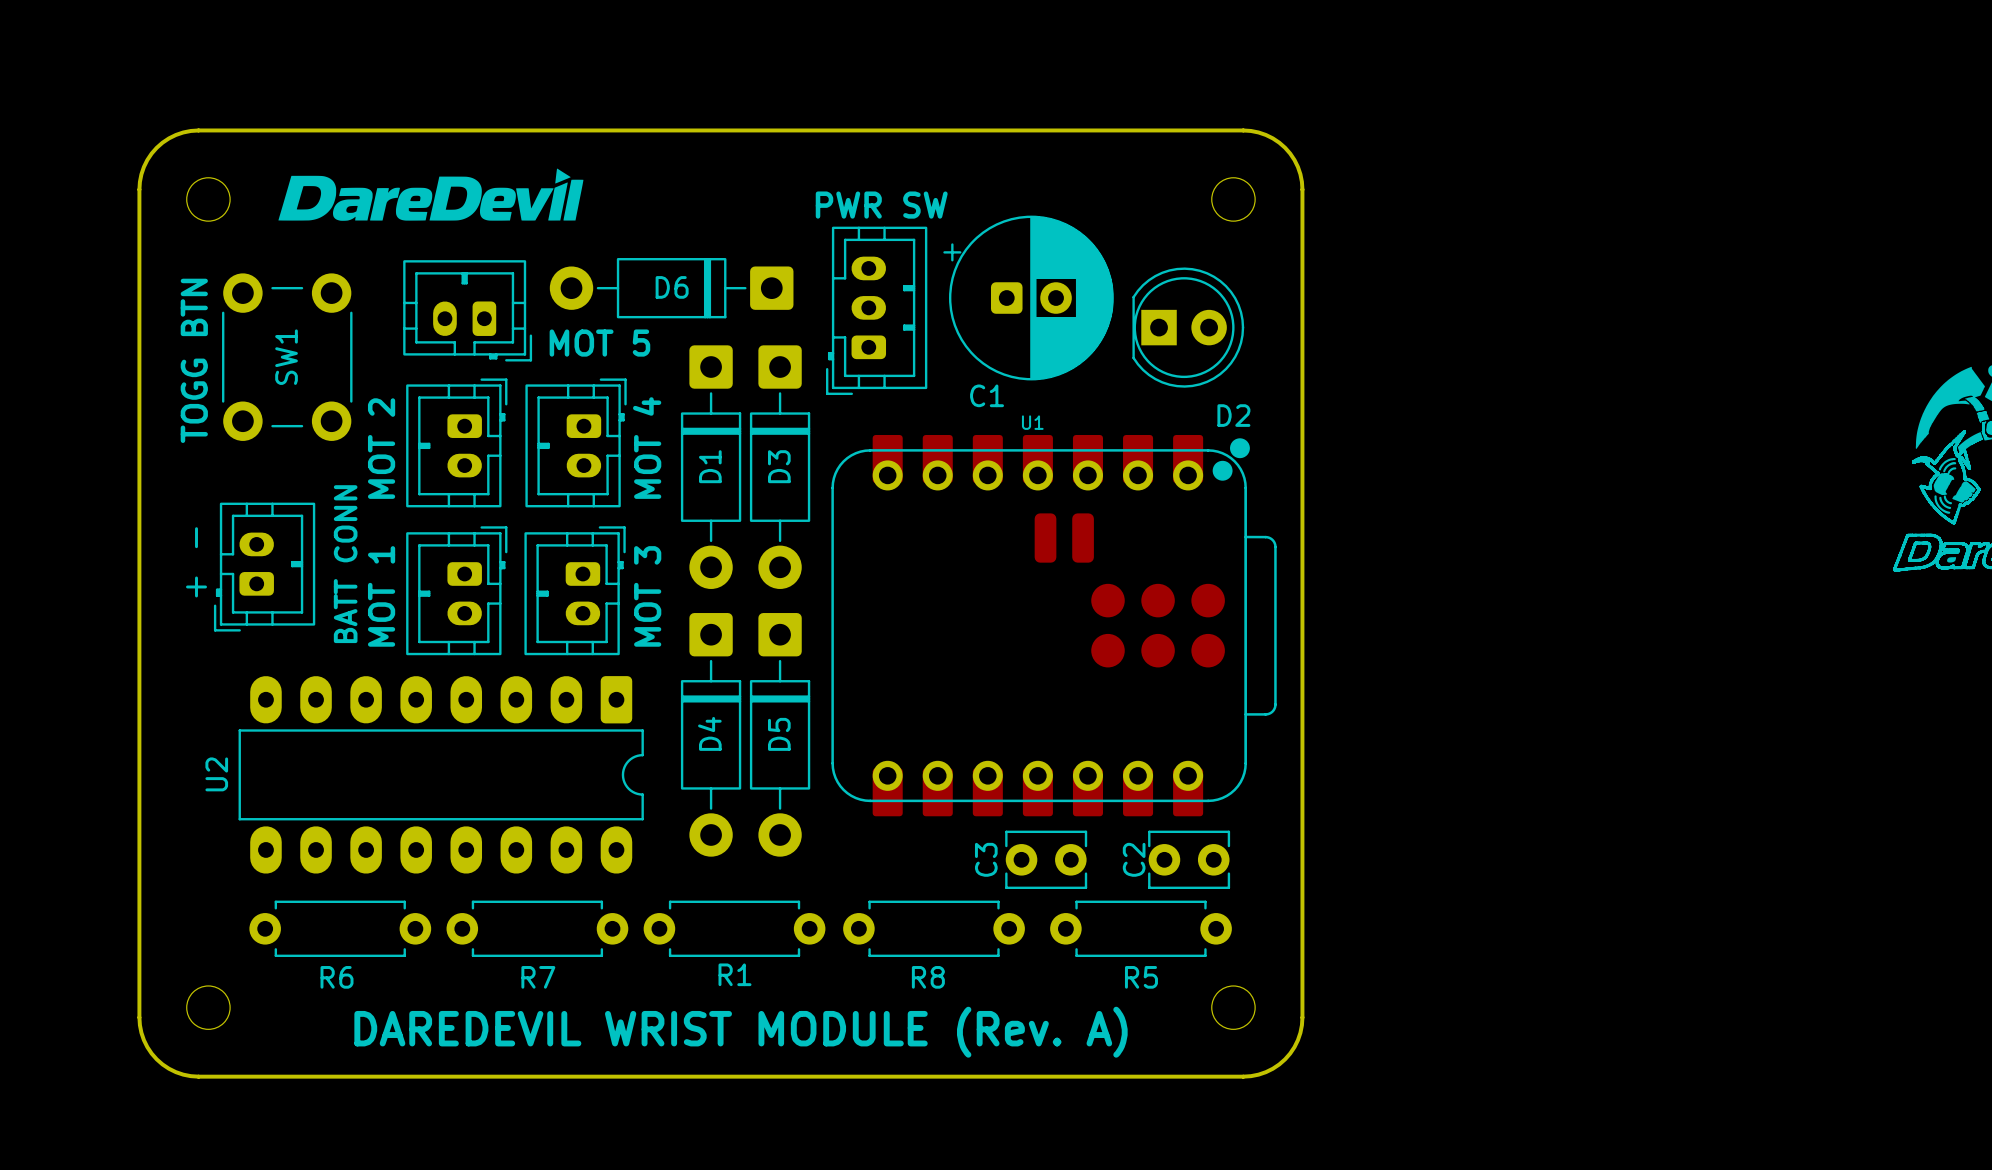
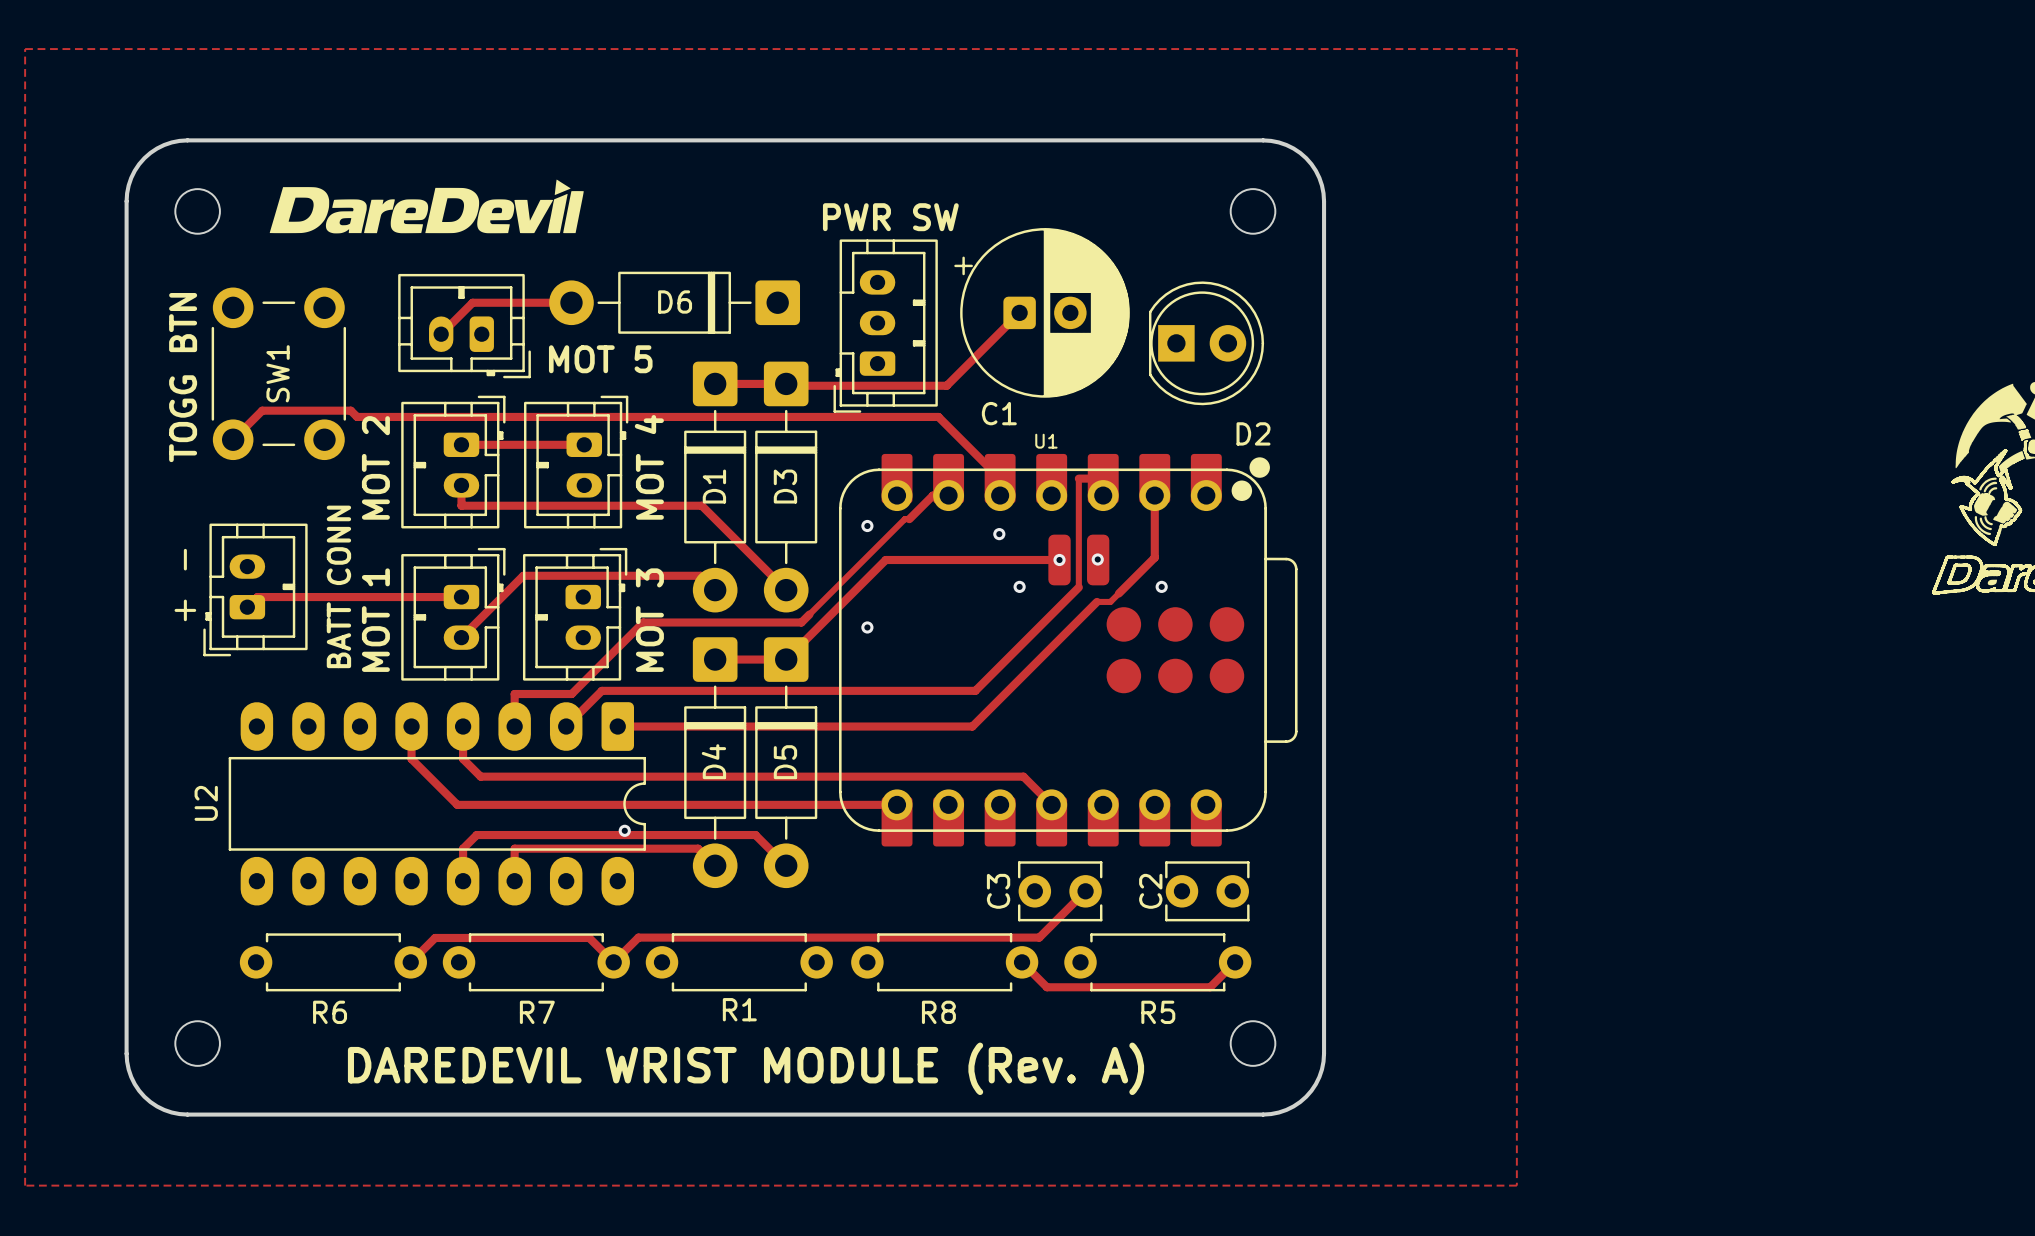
zone outline: none -> (25, 49) (1516, 49) (1516, 1185) (25, 1185) (25, 49)
track: none -> (571, 302) (472, 302) (441, 334)
track: none -> (1019, 312) (946, 385) (715, 383)
track: none -> (233, 439) (262, 410) (350, 410) (357, 416) (938, 416) (1000, 478) (1000, 495)
track: none -> (461, 444) (584, 444)
track: none -> (948, 478) (948, 495) (932, 495) (909, 519) (904, 519) (801, 622) (643, 622) (571, 694) (514, 694) (514, 726)
track: none -> (1154, 478) (1154, 557) (1110, 601) (1097, 601) (972, 726) (617, 726)
track: none -> (461, 485) (461, 505) (701, 505) (786, 590)
track: none -> (1103, 495) (1103, 478) (1078, 478) (1078, 587) (975, 690) (601, 690) (566, 726)
via: none -> (867, 526)
via: none -> (999, 534)
via: none -> (1097, 559)
track: none -> (1059, 559) (885, 559) (786, 659) (715, 659)
via: none -> (1059, 559)
via: none -> (1019, 586)
via: none -> (1161, 586)
track: none -> (715, 590) (700, 575) (523, 575) (461, 637)
track: none -> (461, 597) (257, 597) (247, 607)
via: none -> (867, 627)
track: none -> (411, 726) (411, 759) (457, 804) (897, 804) (897, 821)
track: none -> (463, 726) (463, 759) (480, 776) (1023, 776) (1051, 804) (1051, 821)
via: none -> (624, 830)
track: none -> (715, 865) (698, 848) (514, 848) (514, 881)
track: none -> (786, 865) (755, 835) (476, 835) (463, 848) (463, 881)
track: none -> (1085, 891) (1039, 937) (638, 937) (613, 962) (589, 937) (435, 937) (410, 962)
track: none -> (1022, 962) (1046, 987) (1210, 987) (1235, 962)

